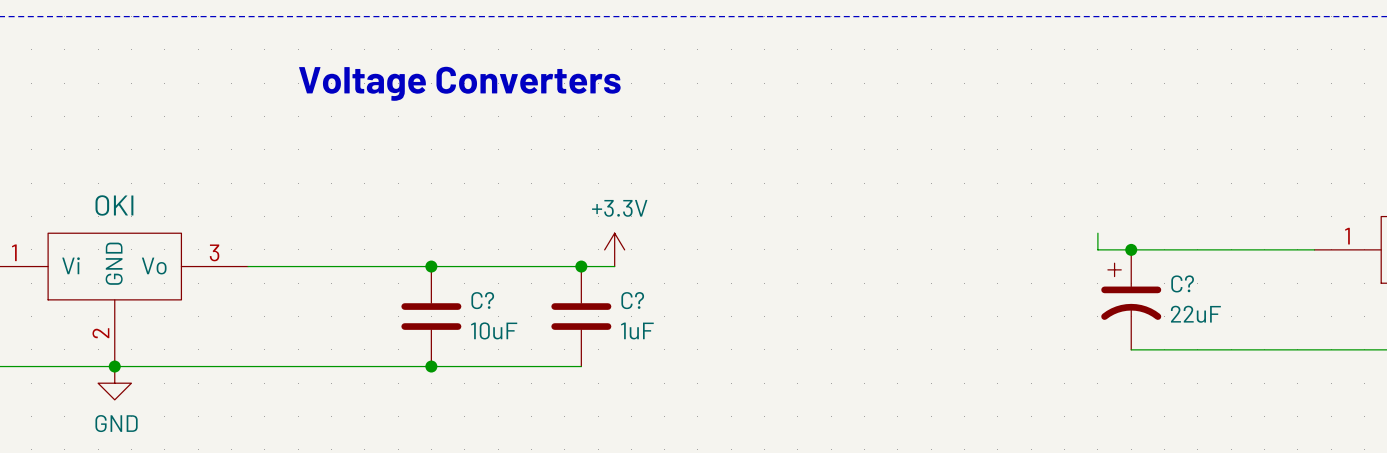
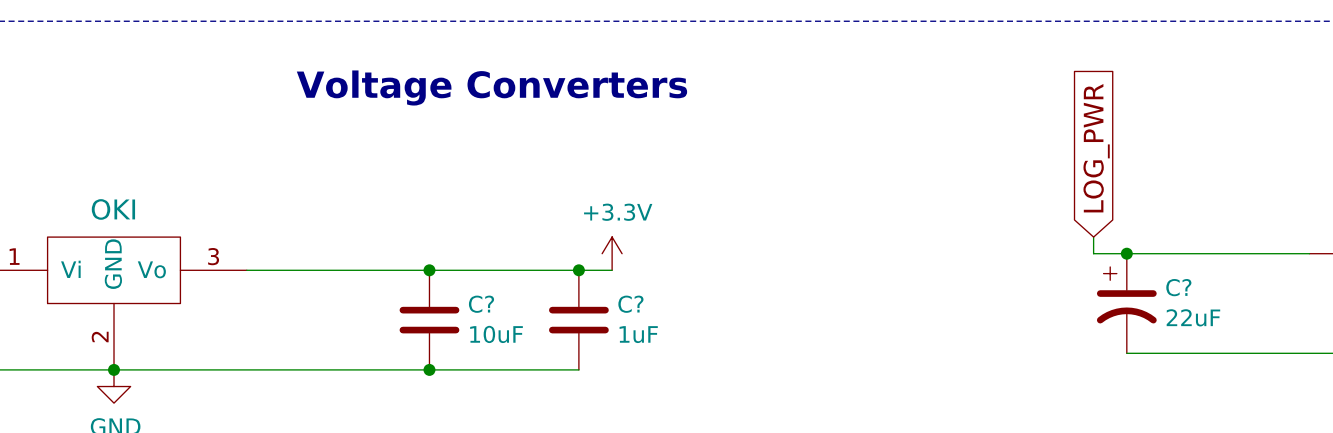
global label: none -> LOG_PWR (1096, 148)

